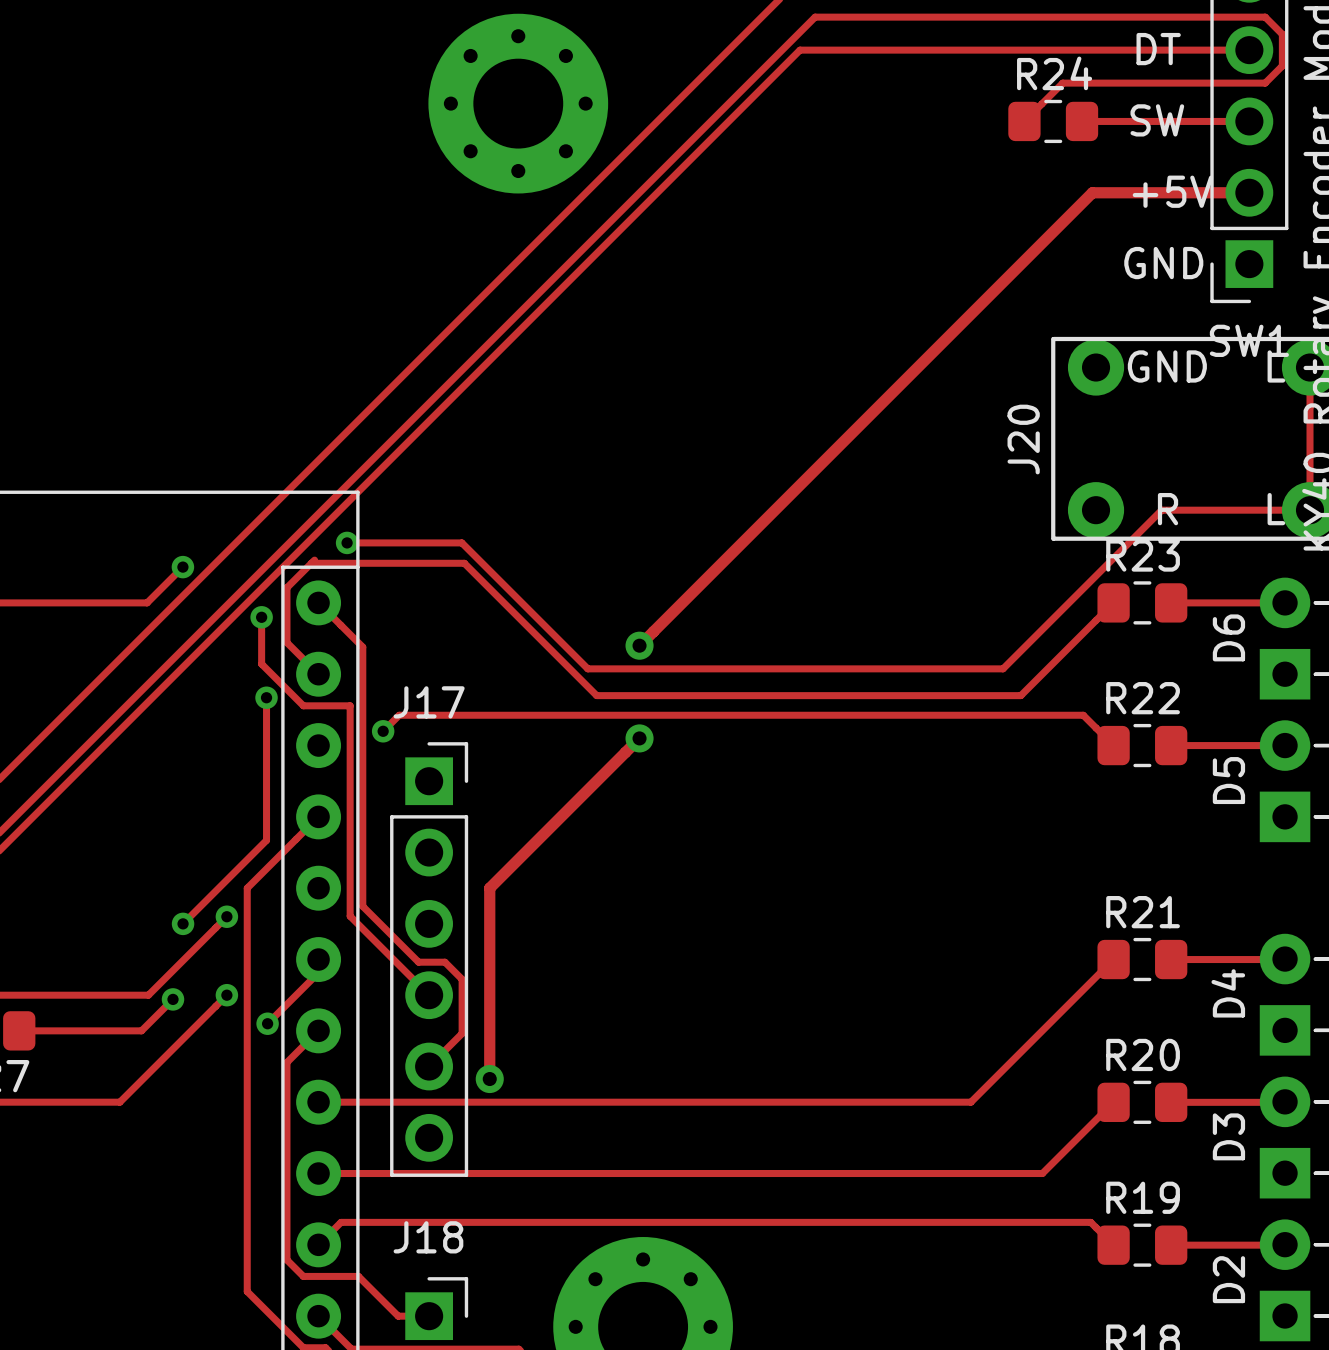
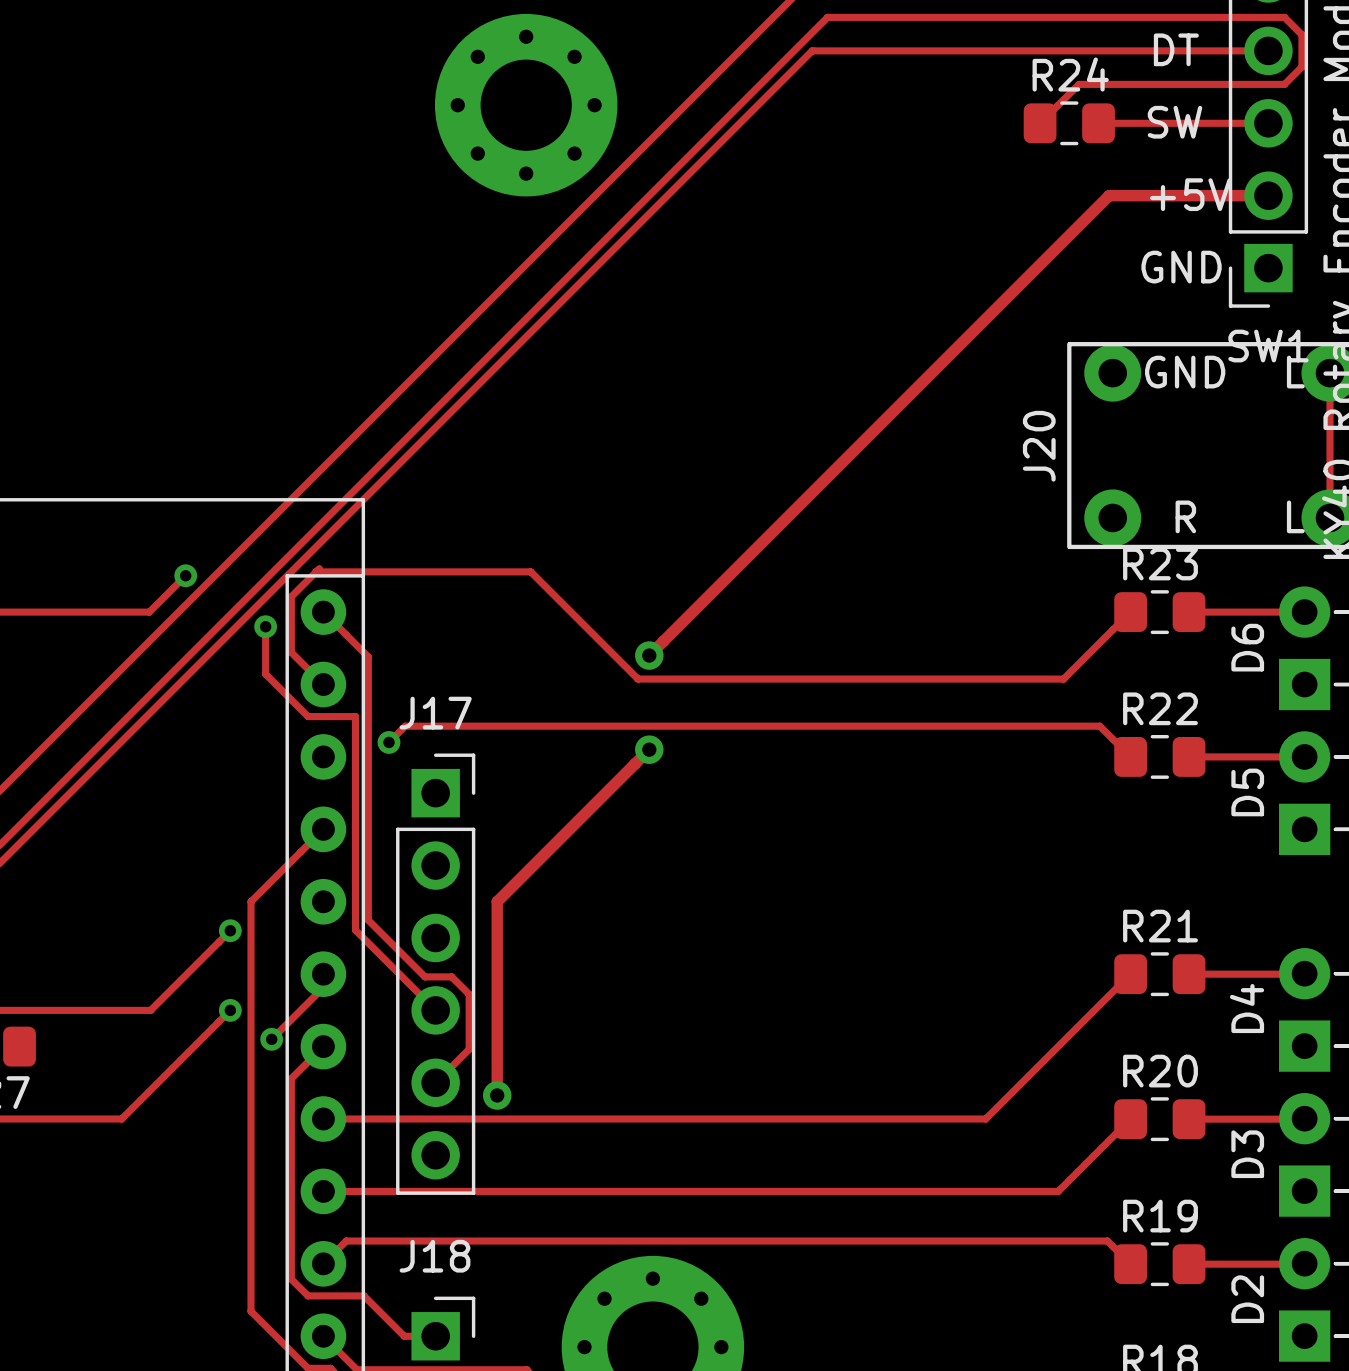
track: (1310, 510) (1161, 510) (1003, 668) -> (1063, 679) (1018, 679)
track: (347, 542) (461, 542) (587, 668) (628, 668) -> (471, 571) (530, 571) (638, 679)
via: (347, 542) -> none
track: (464, 563) (596, 695) (1020, 695) (1047, 668) -> none
track: (266, 697) (266, 840) (183, 923) -> none
via: (266, 697) -> none
via: (183, 923) -> none
track: (173, 999) (141, 1030) (19, 1030) -> none
via: (173, 999) -> none

